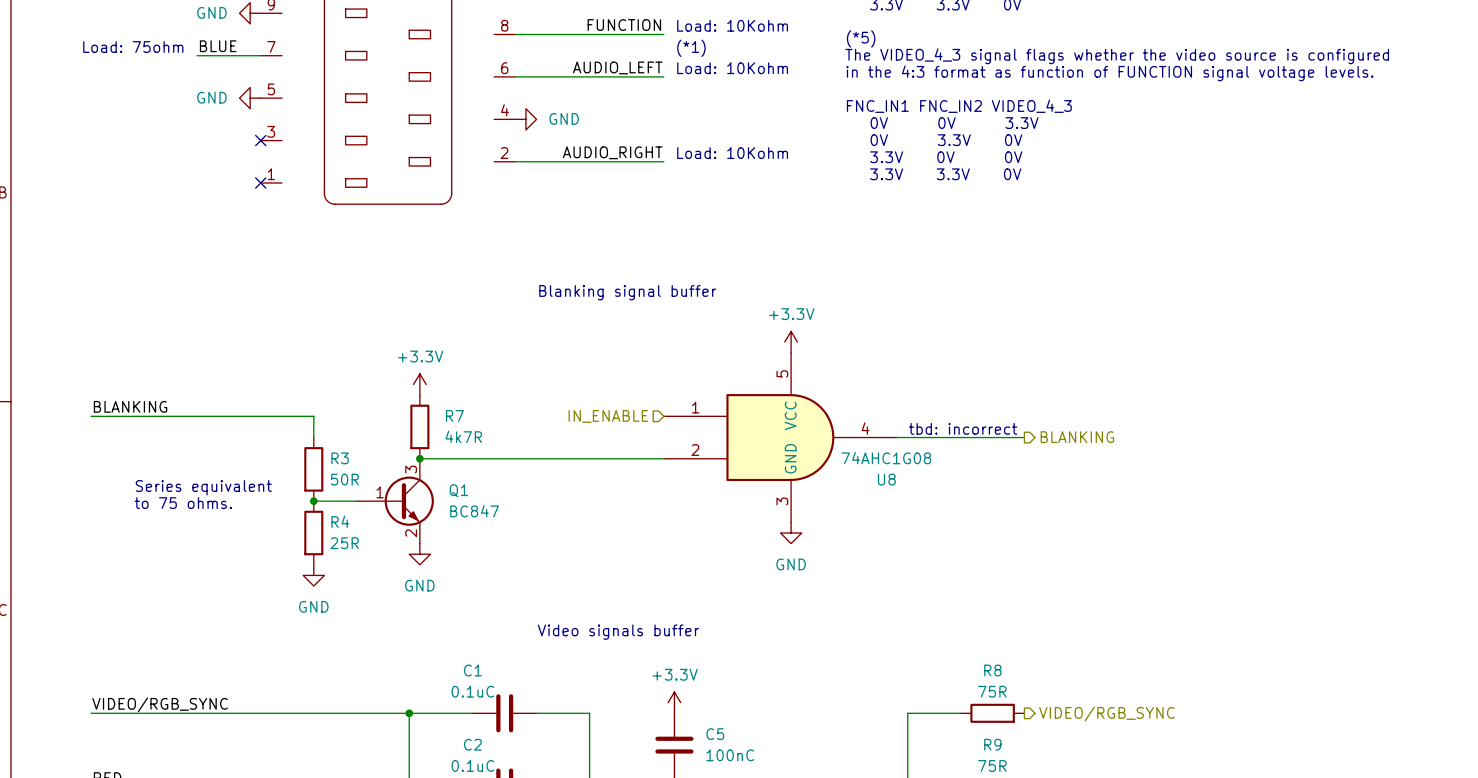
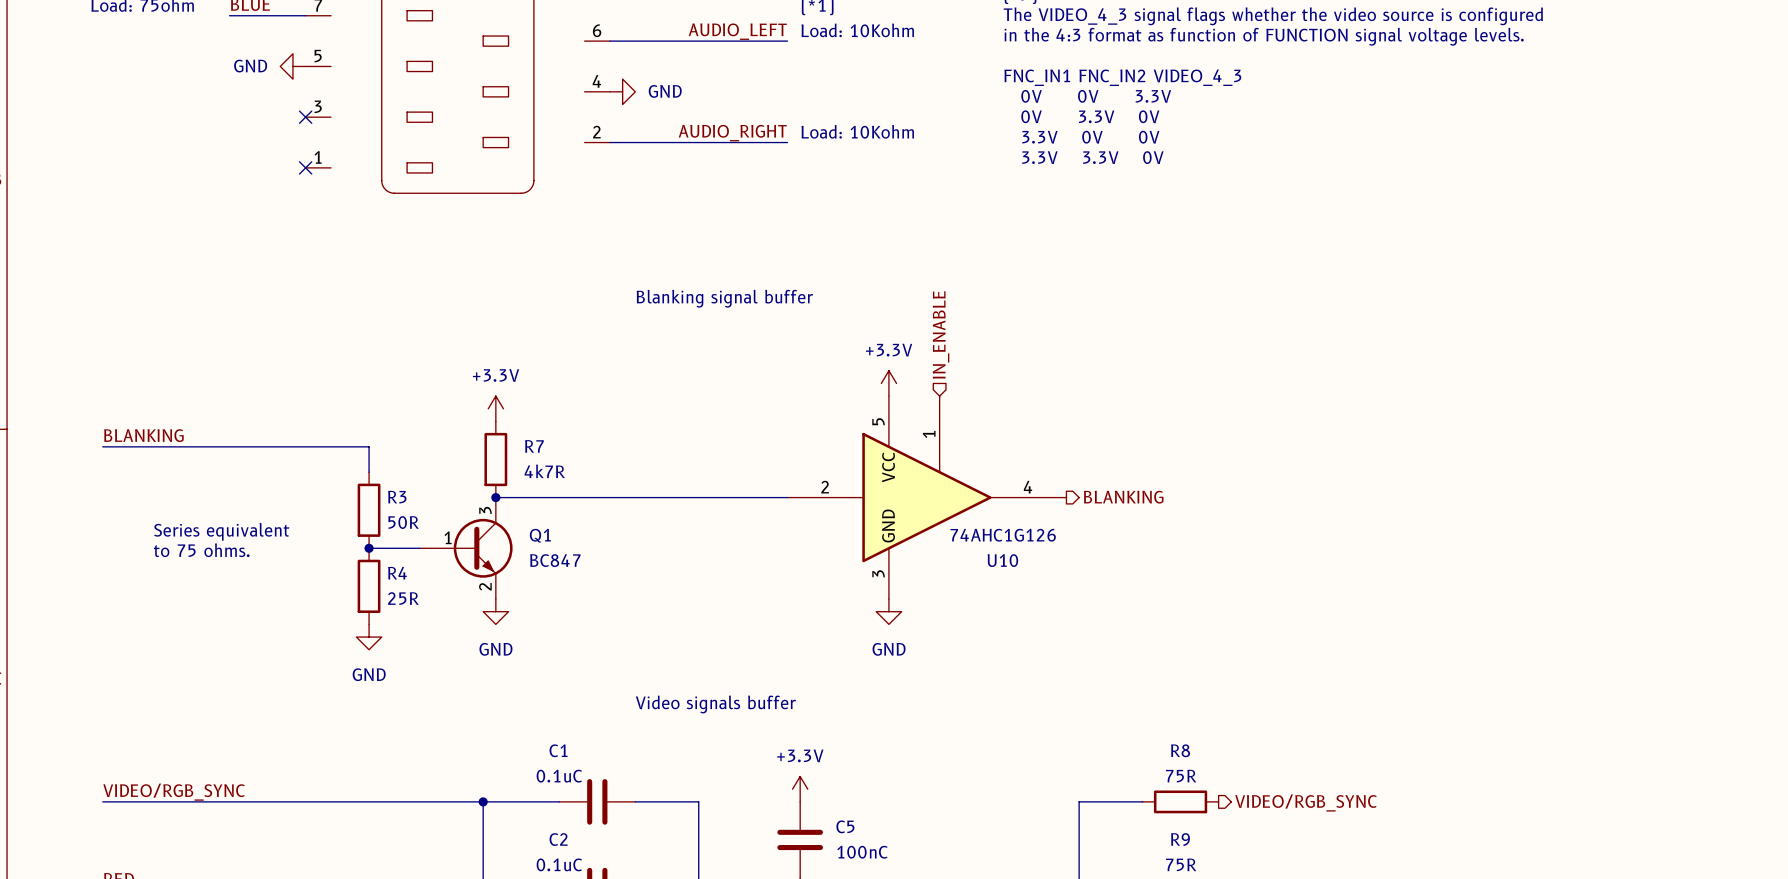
power symbol position: +3.3V (791, 342) -> +3.3V (888, 383)
hierarchical label rotation: 0° (608, 416) -> 90° clockwise (941, 334)
hierarchical label position: IN_ENABLE (608, 416) -> IN_ENABLE (941, 334)
text: tbd: incorrect (963, 428) -> none
U8: 74AHC1G08 (780, 437) -> none
wire: (897, 437) (1024, 437) -> none
hierarchical label position: BLANKING (1077, 437) -> BLANKING (1123, 497)
U10: none -> 74AHC1G126 (926, 497)
power symbol position: GND (791, 533) -> GND (888, 611)

